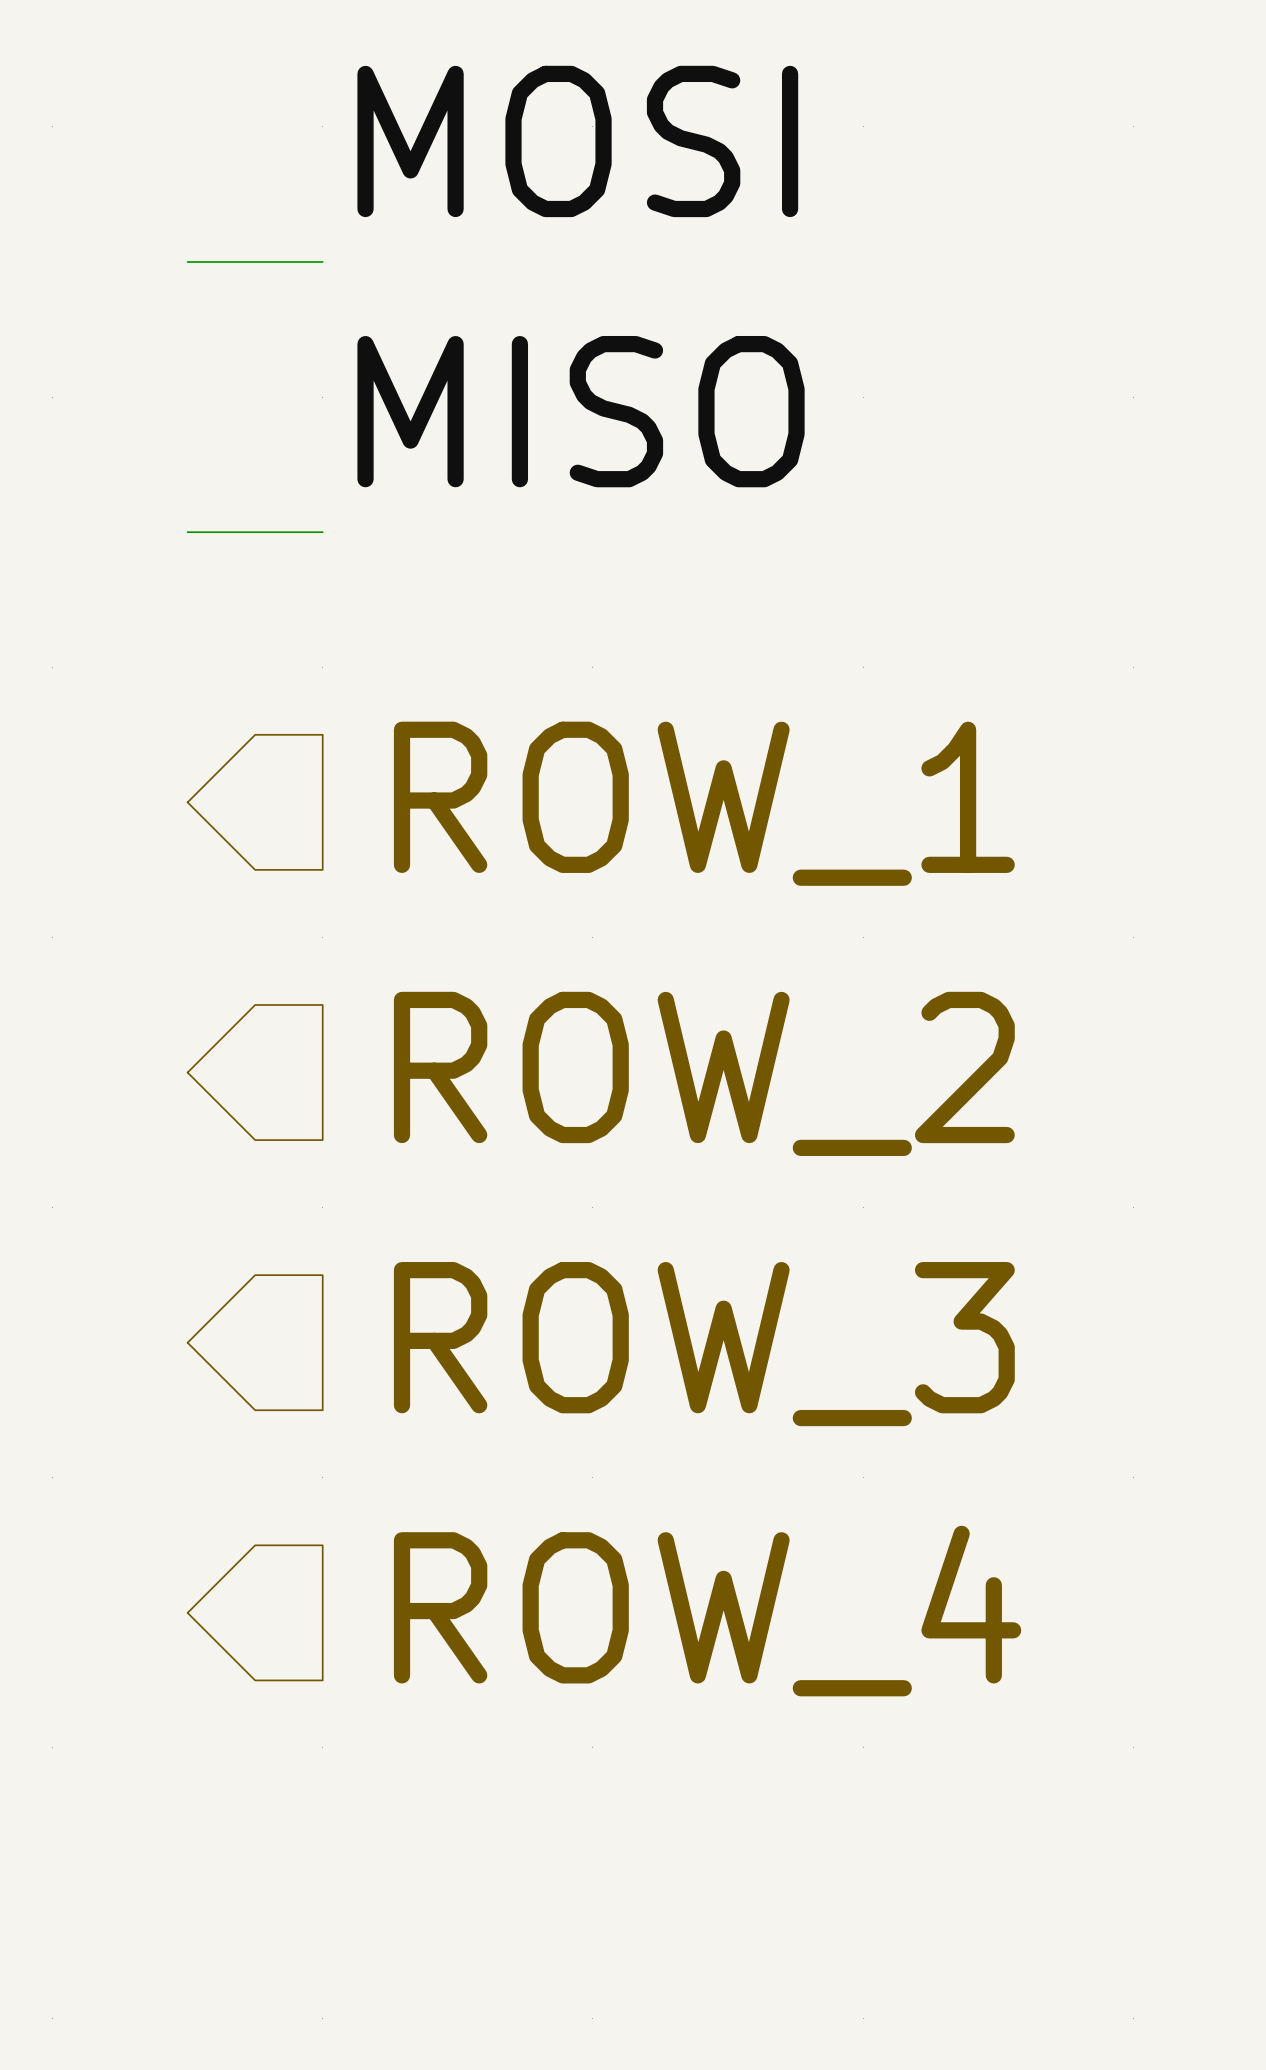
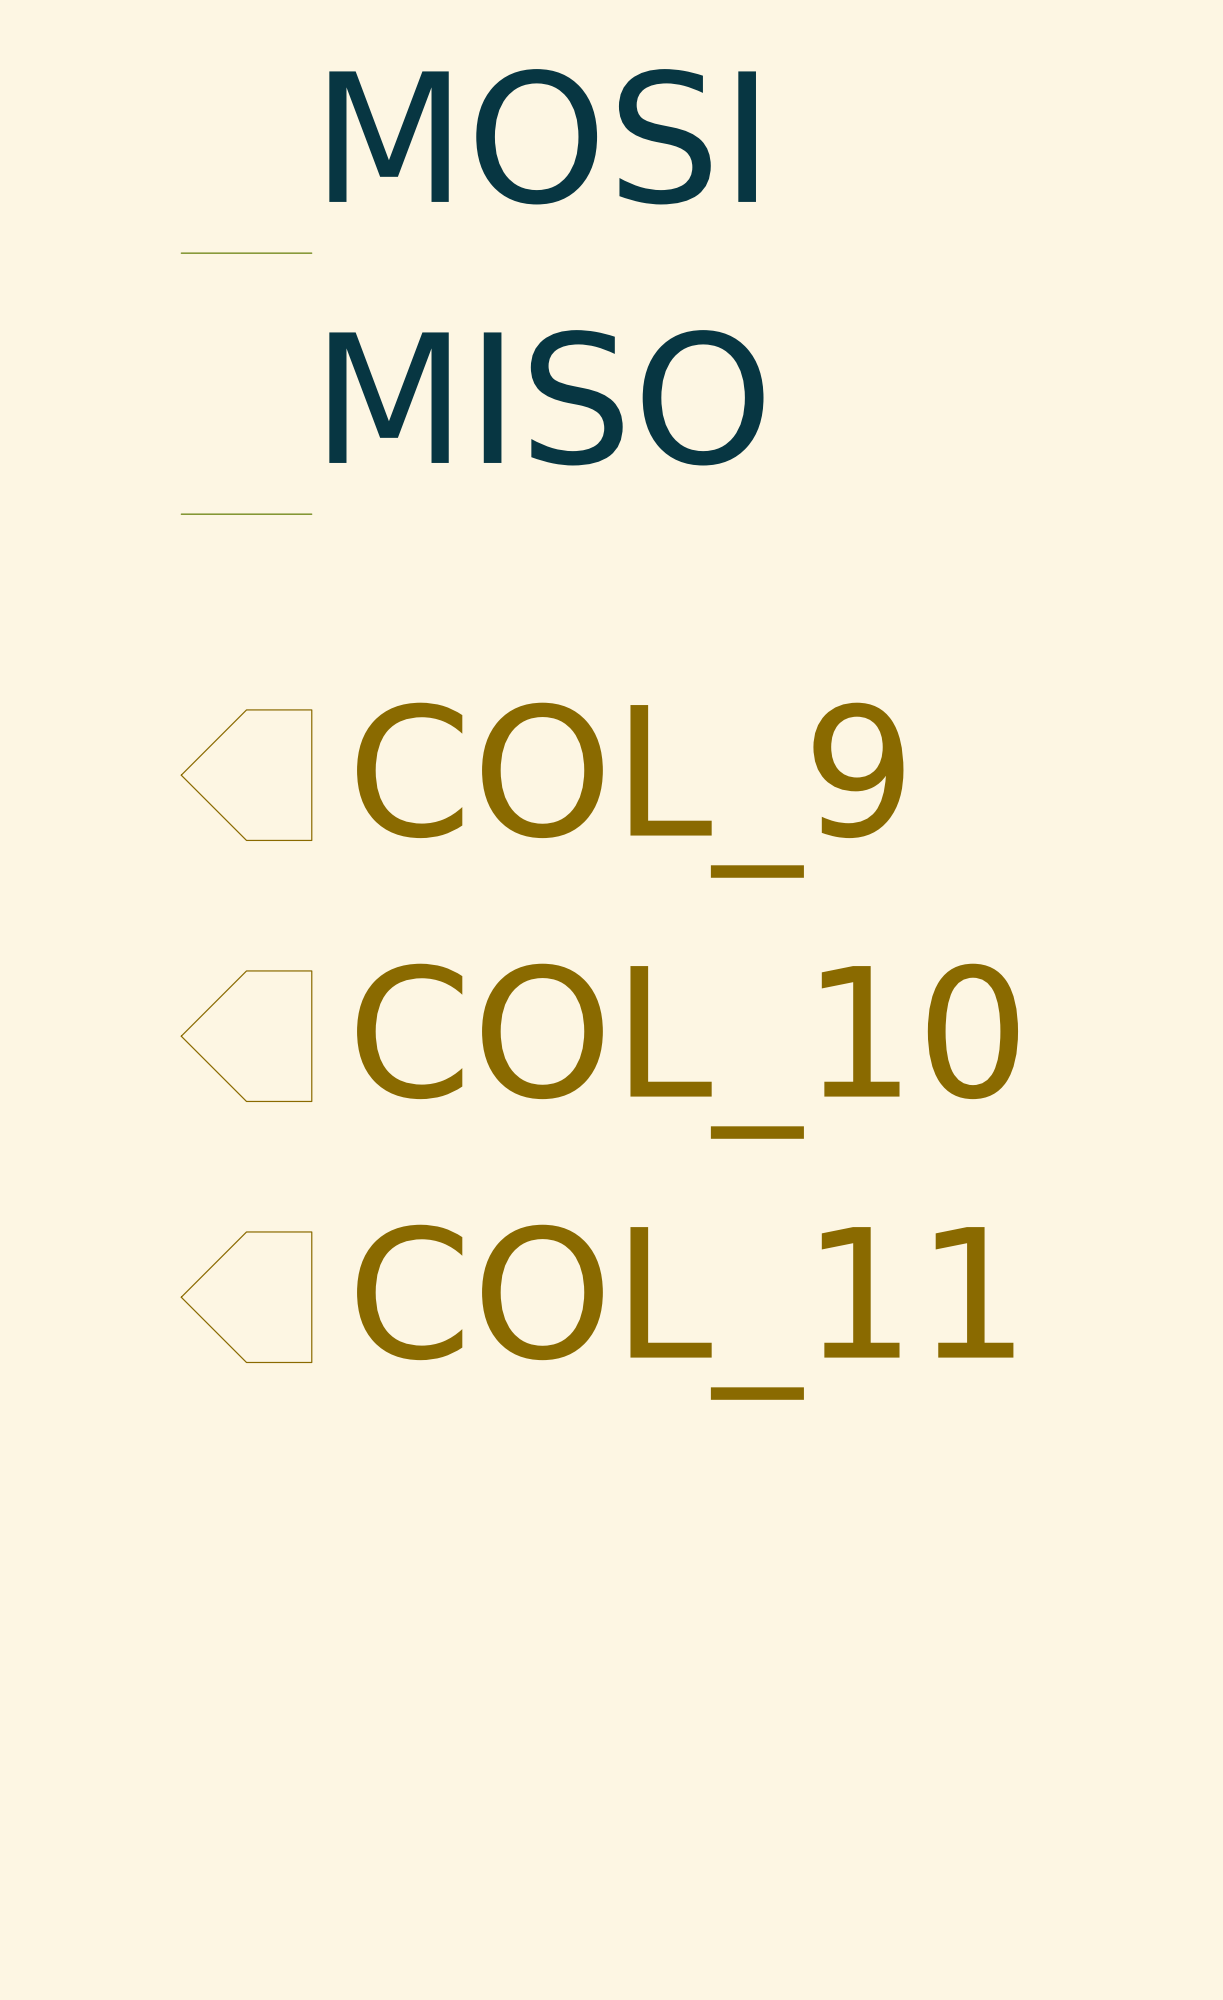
hierarchical label: ROW_1 (704, 803) -> COL_9 (630, 790)
hierarchical label: ROW_2 (704, 1073) -> COL_10 (687, 1051)
hierarchical label: ROW_3 (704, 1344) -> COL_11 (685, 1312)
hierarchical label: ROW_4 (707, 1611) -> none

